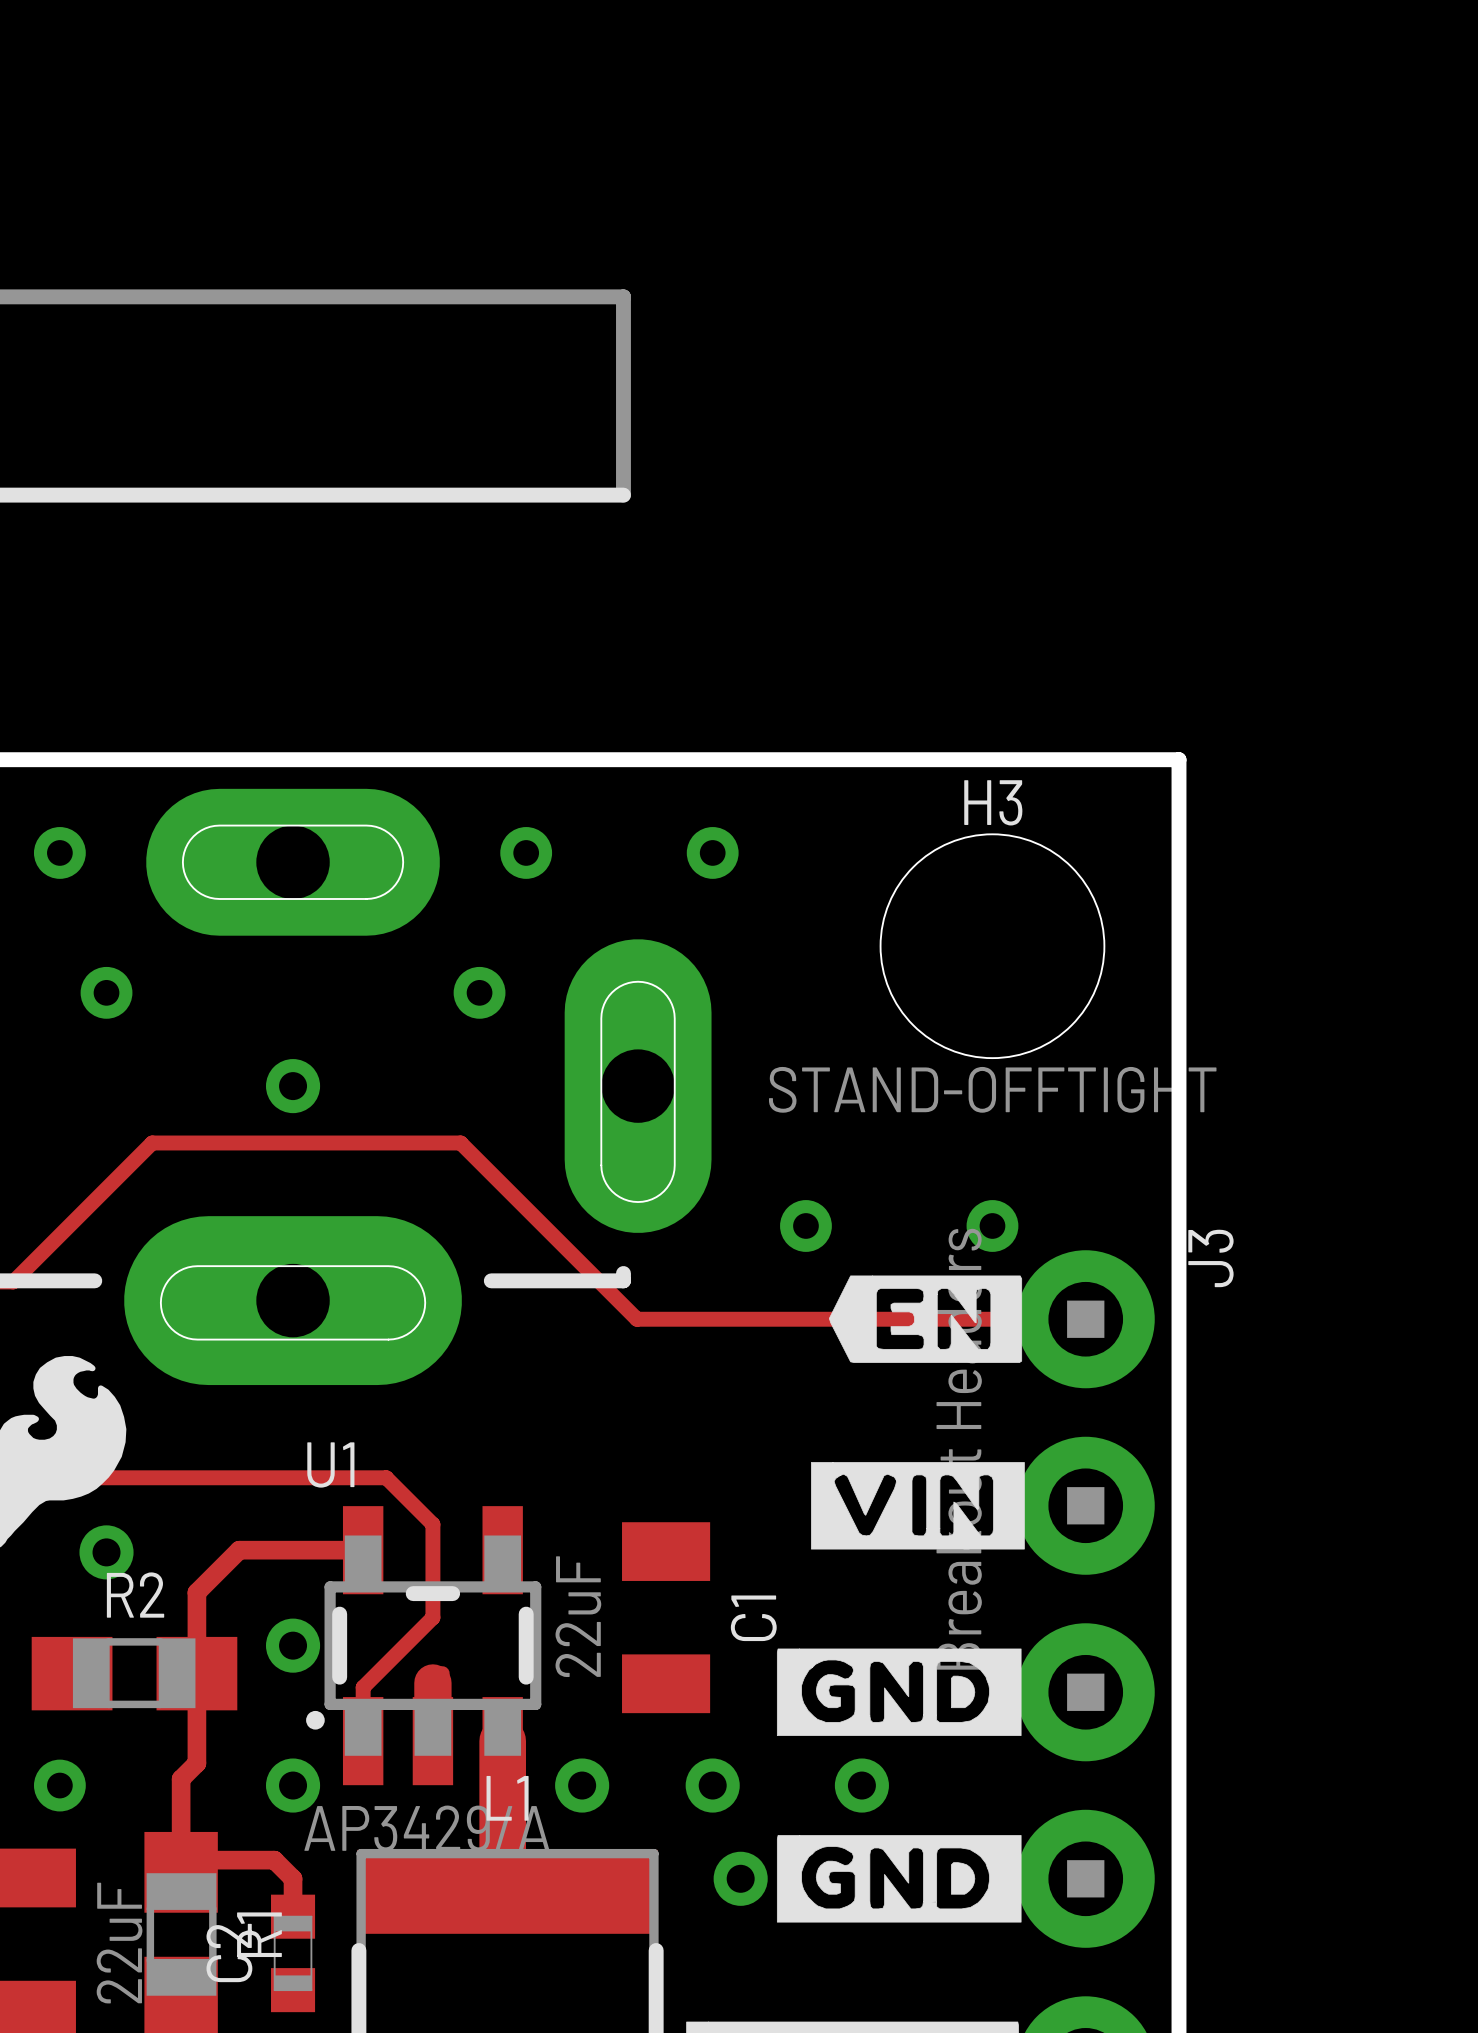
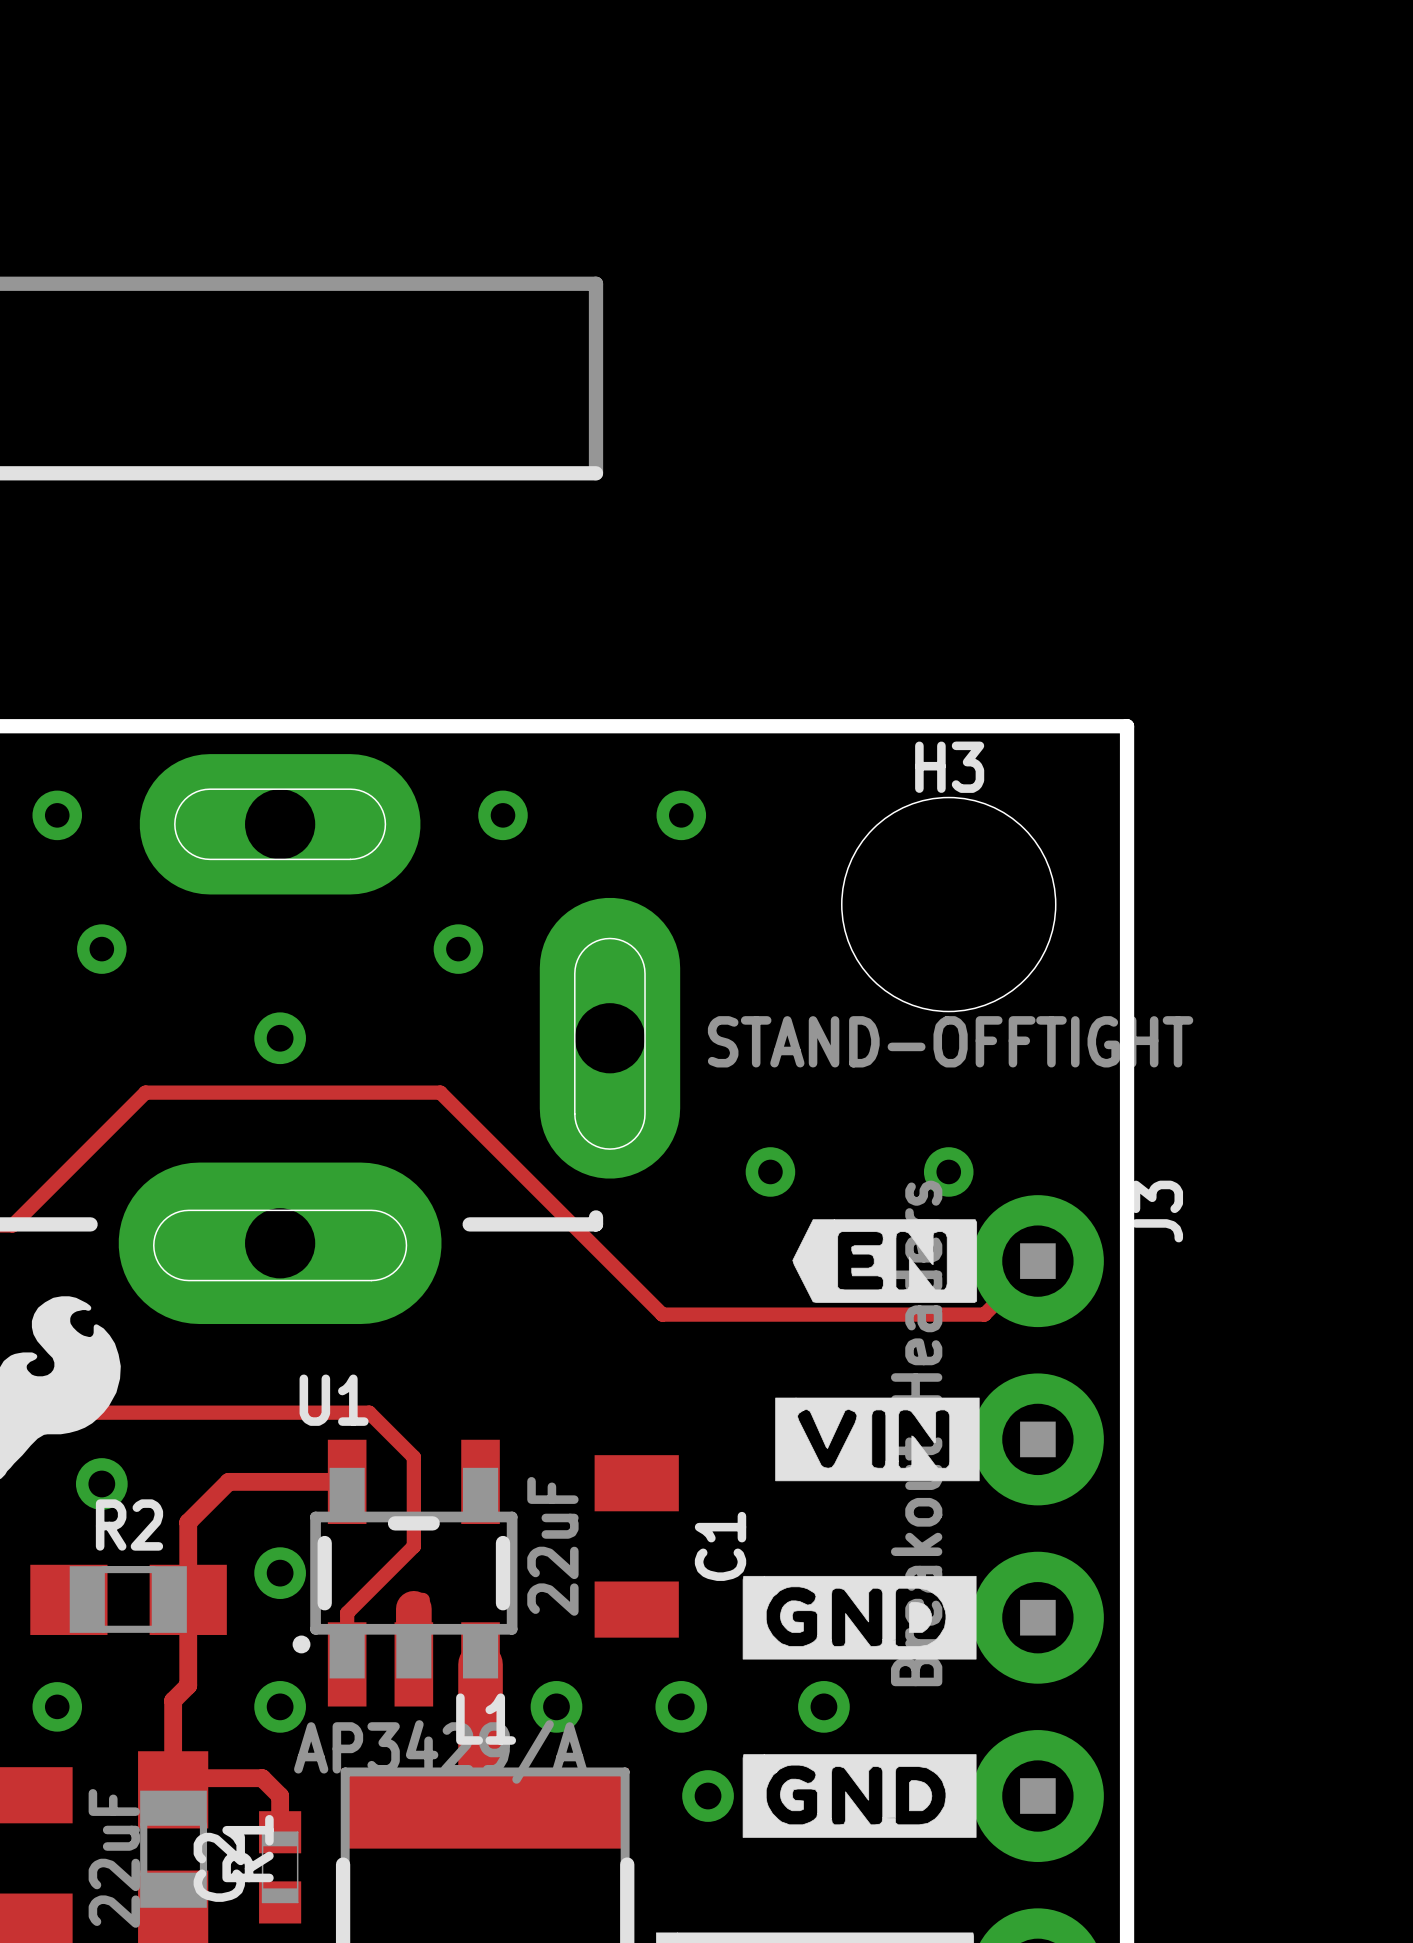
top track: (636, 1319) (1085, 1319) -> (608, 1261) (662, 1314) (984, 1314) (1037, 1261)

